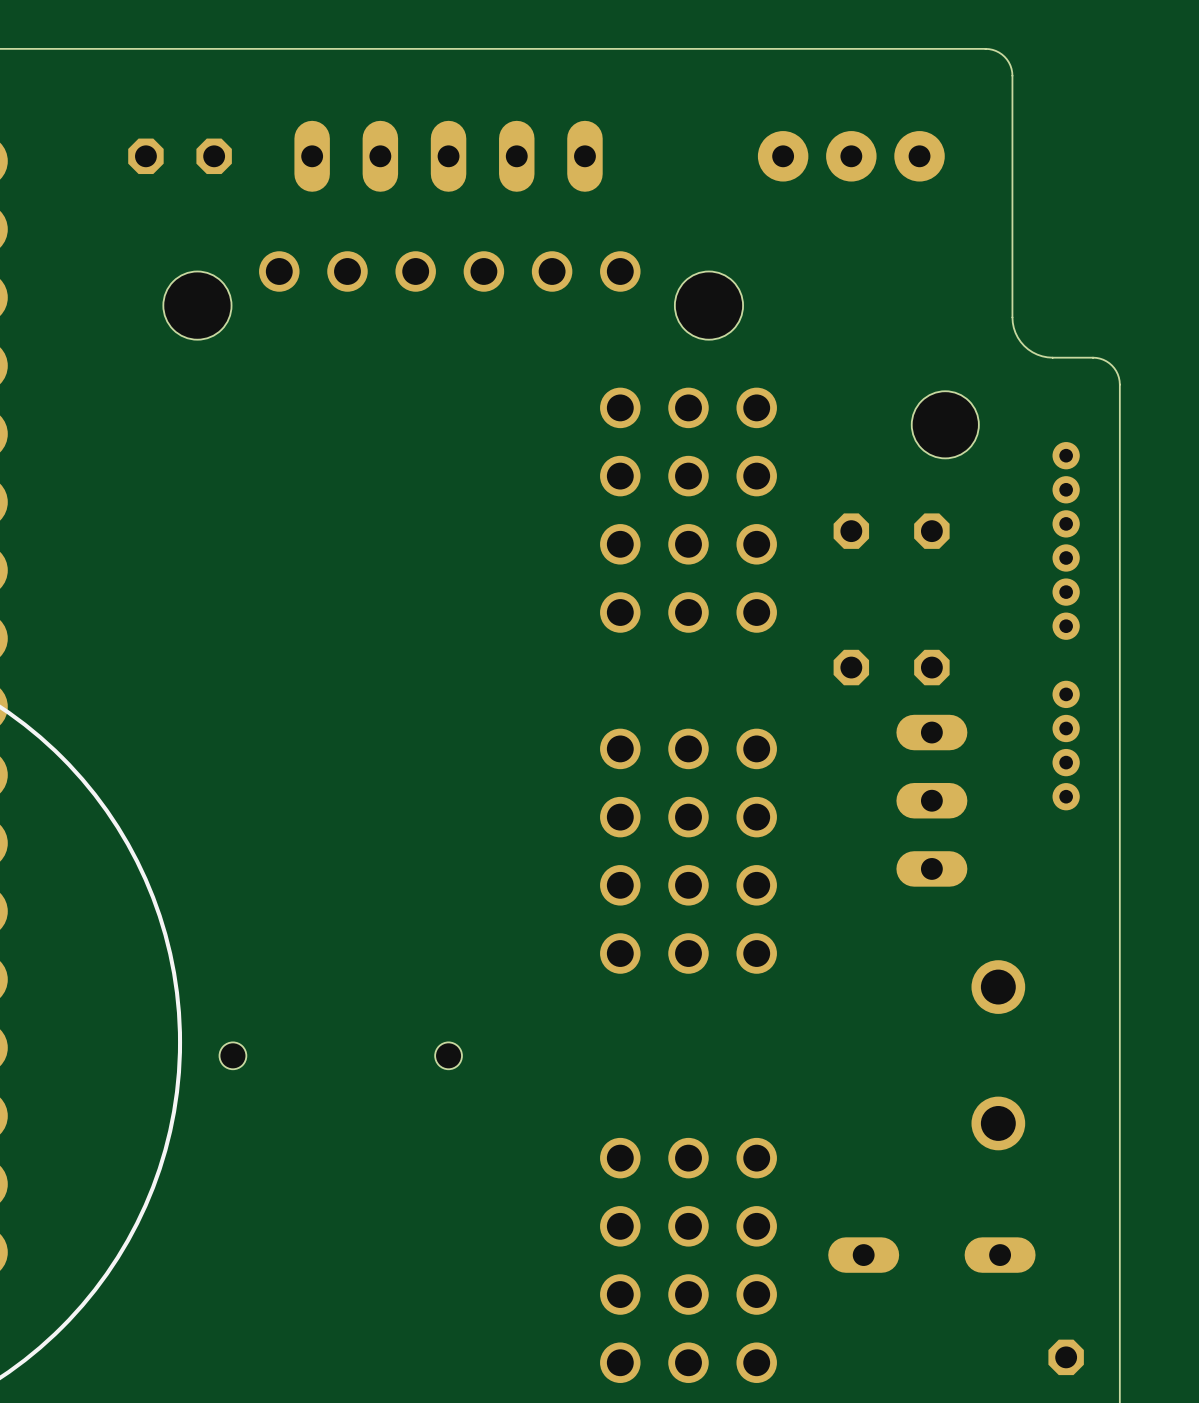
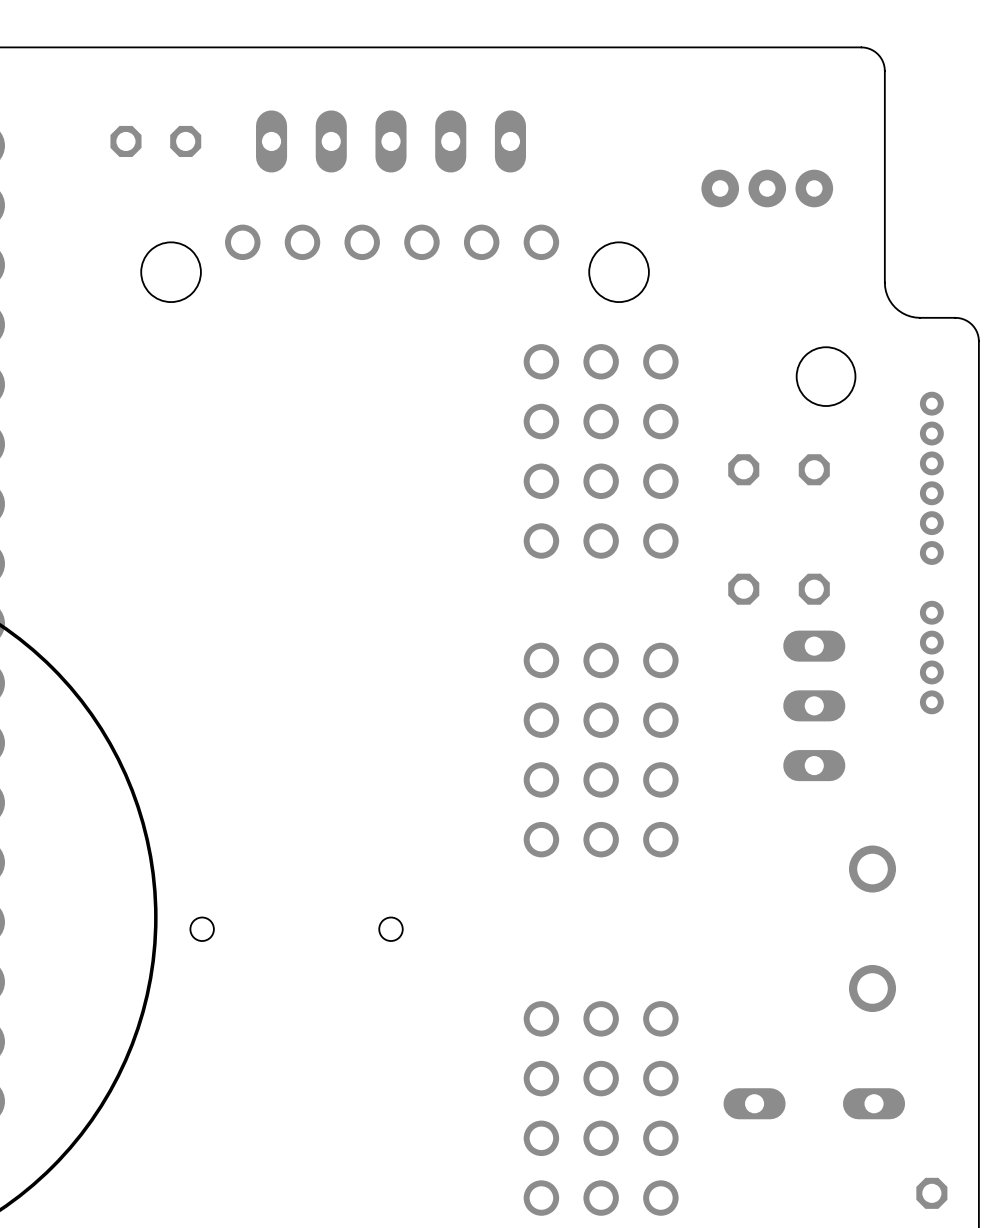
part: (851, 156) -> none
part: none -> (767, 188)

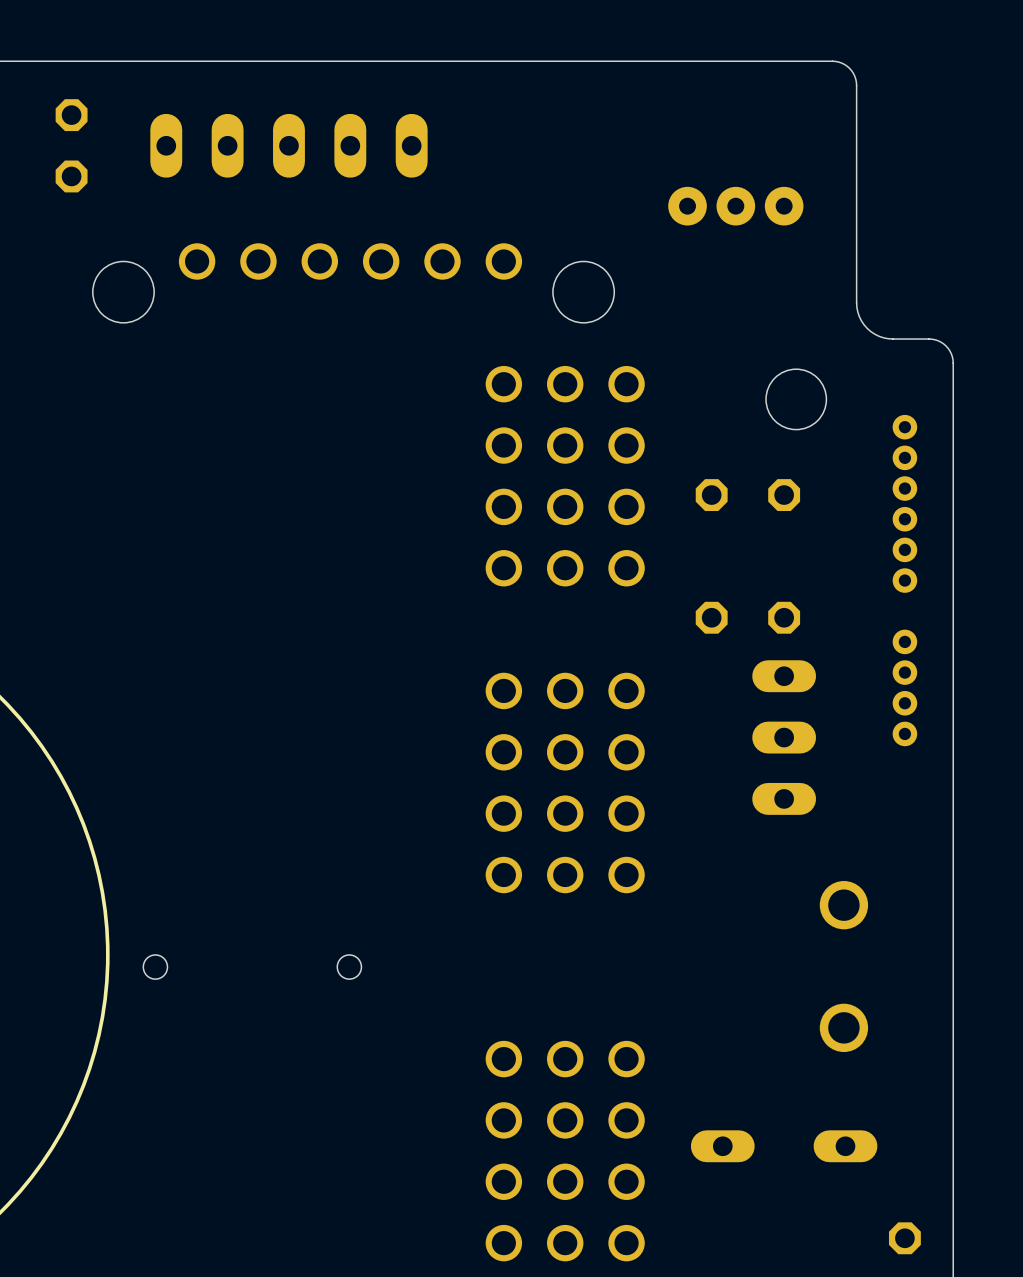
part rotation: 0° (155, 141) -> 90° clockwise (71, 145)
part position: (391, 141) -> (288, 145)

